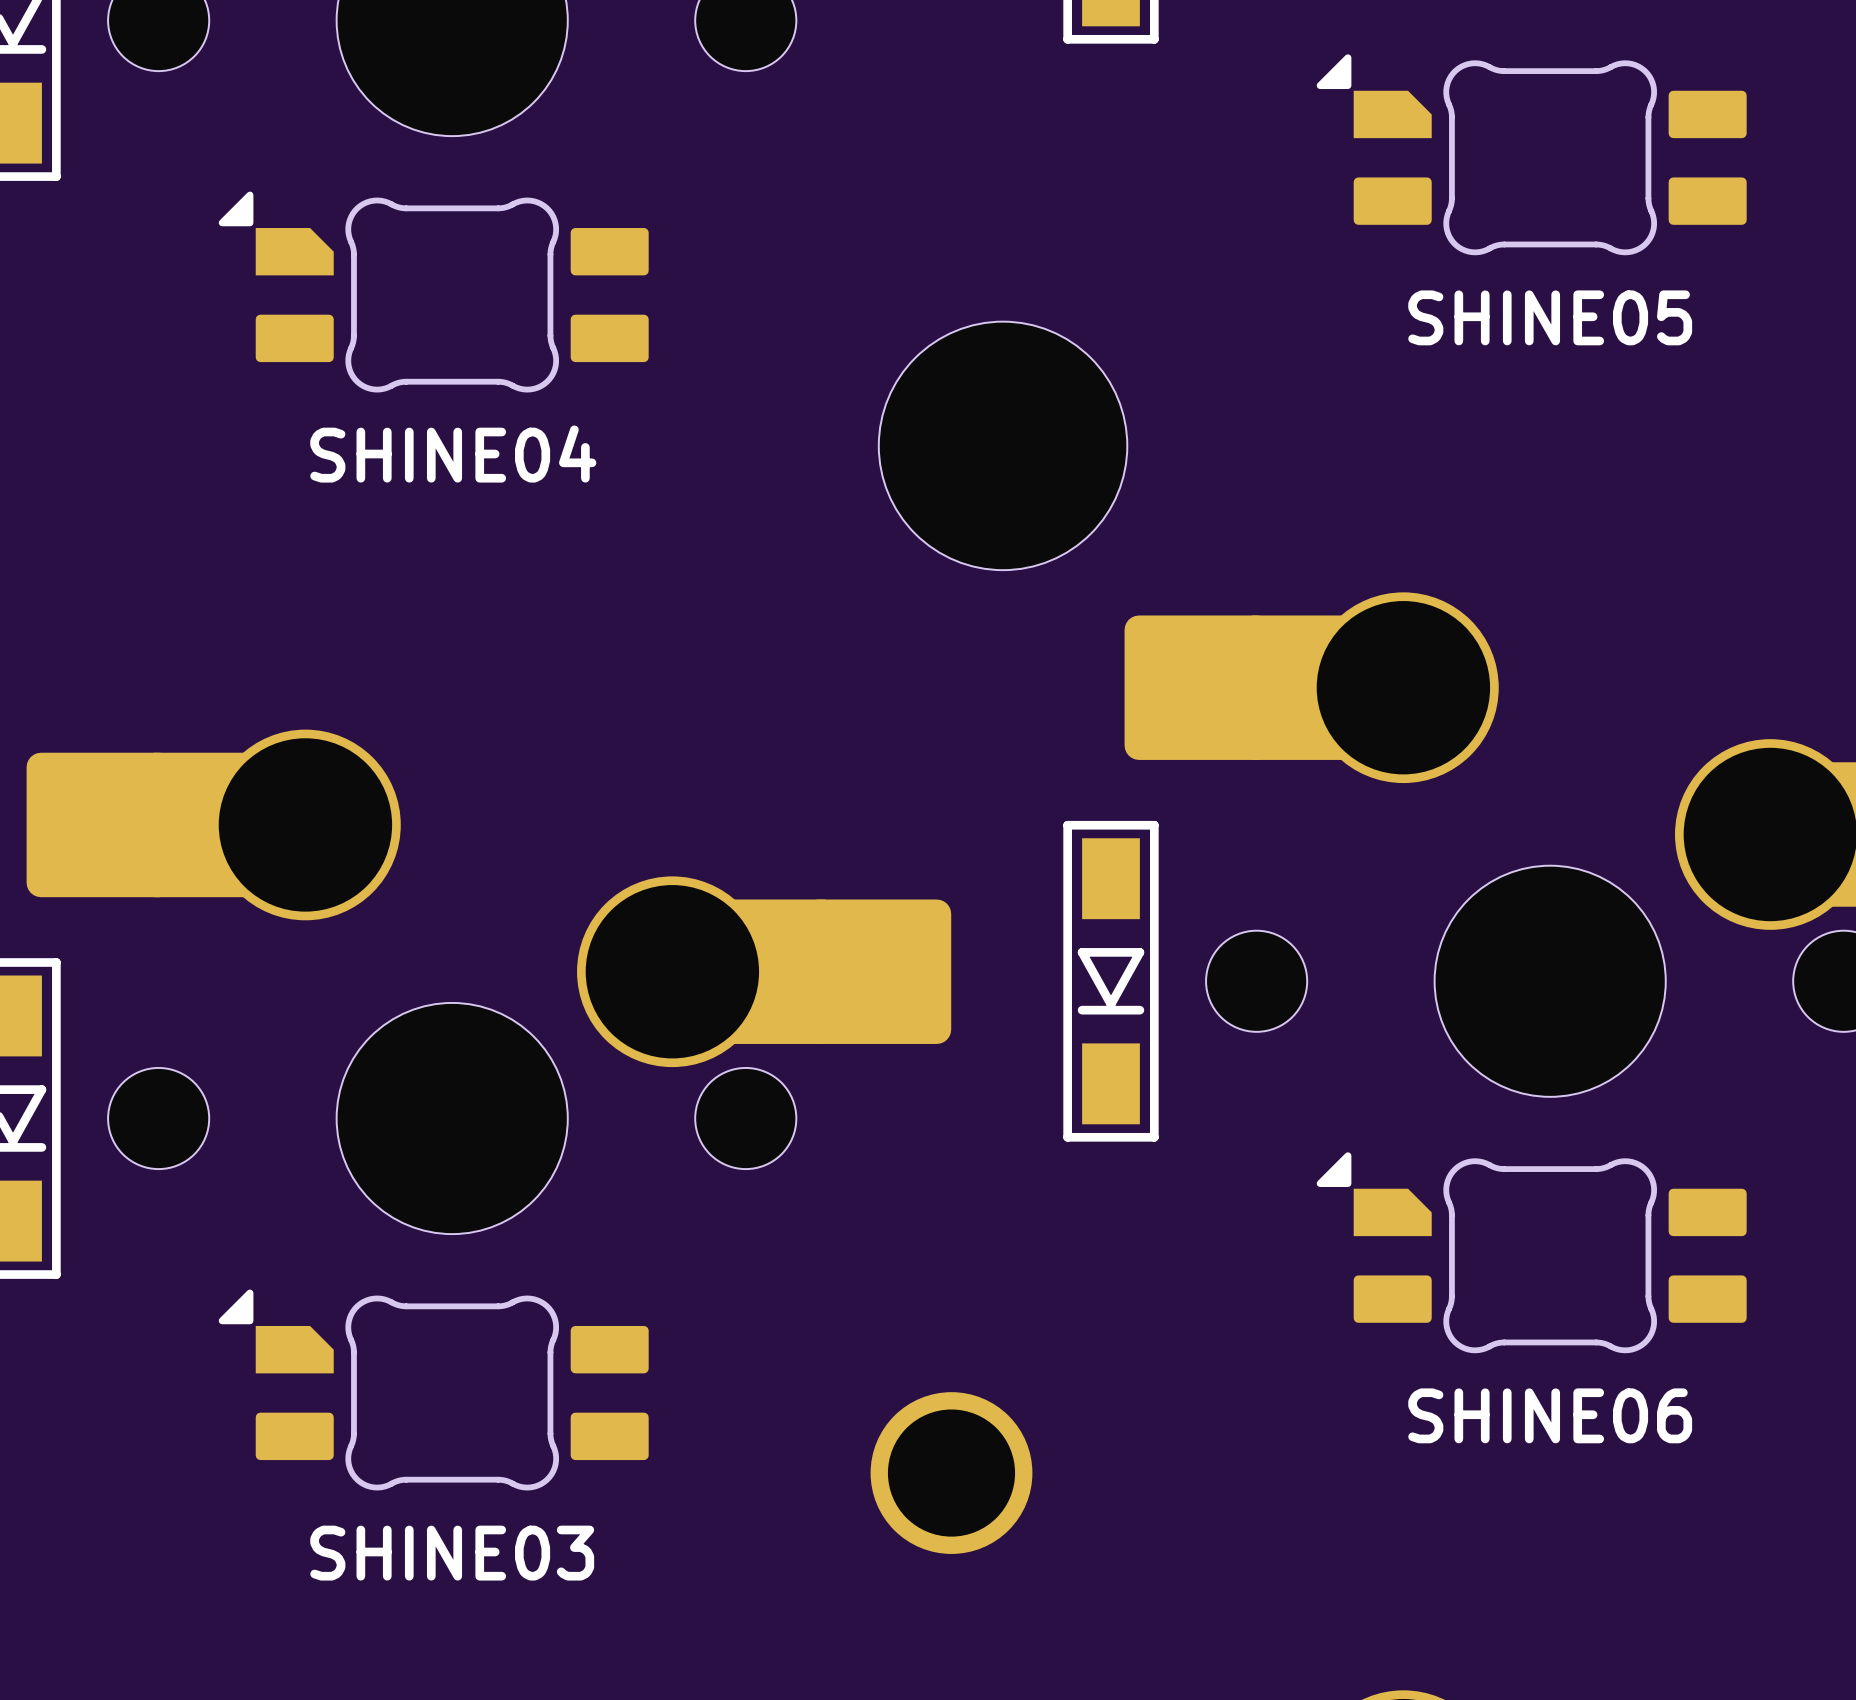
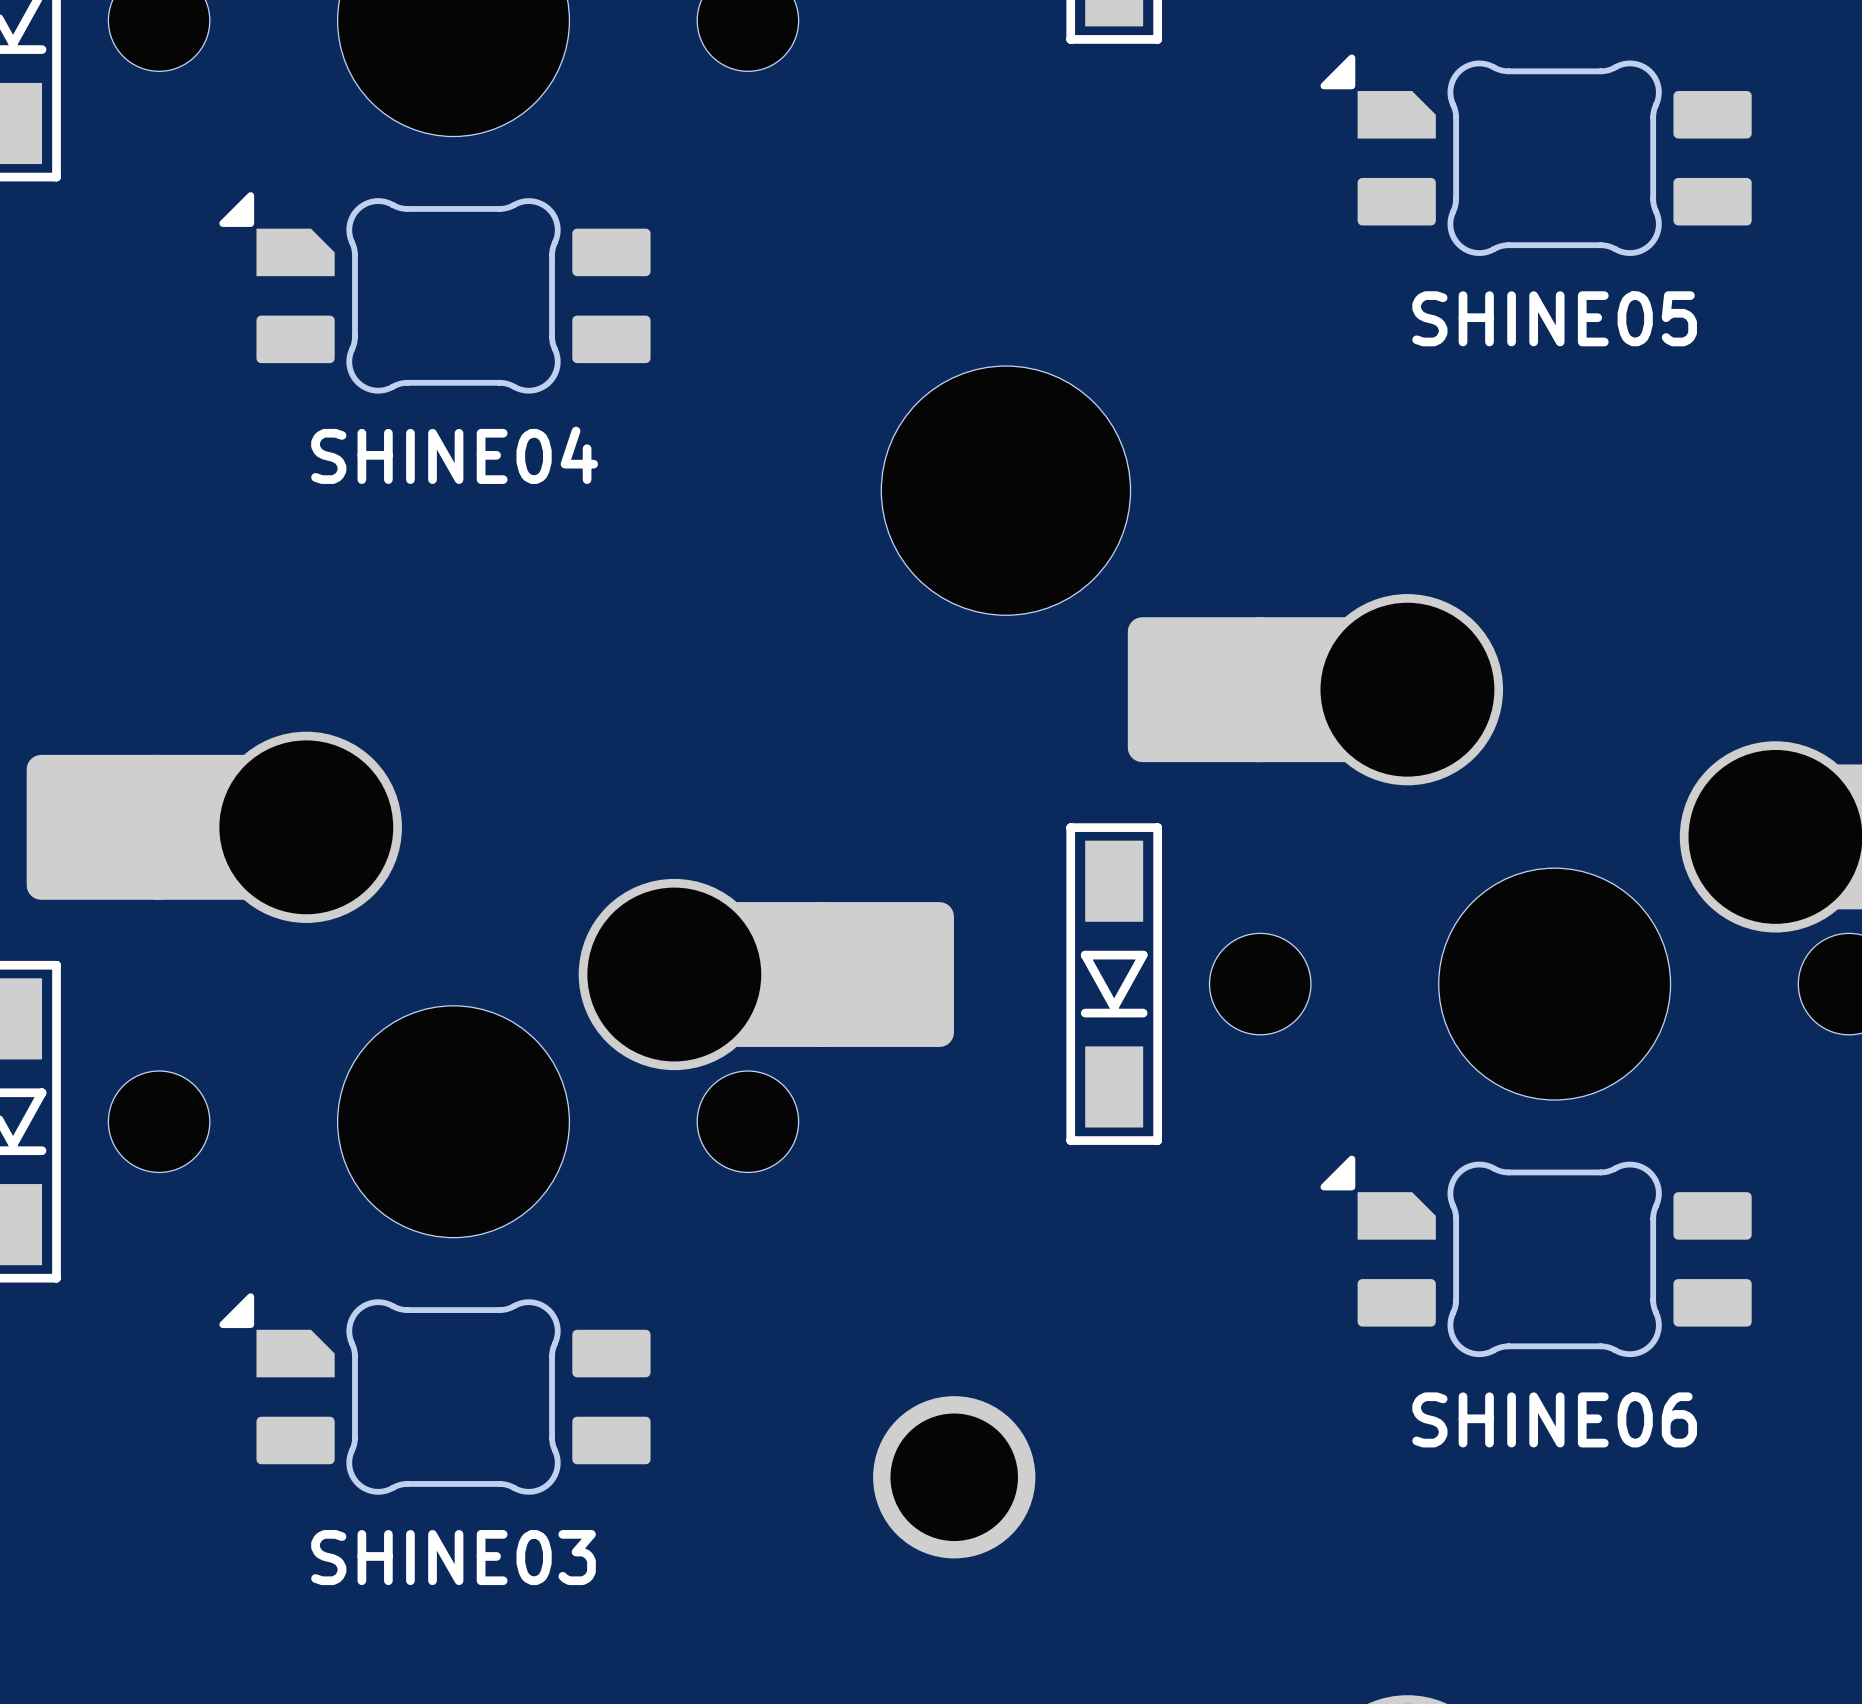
part position: (1003, 445) -> (1005, 490)

